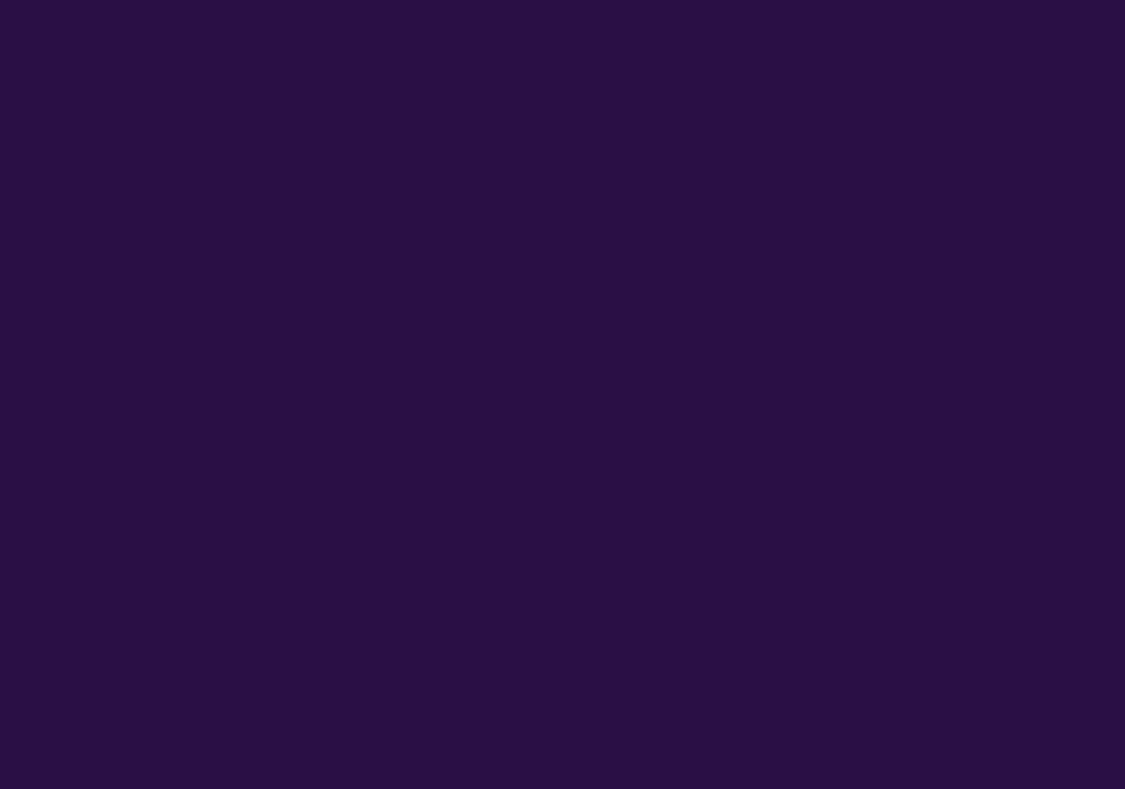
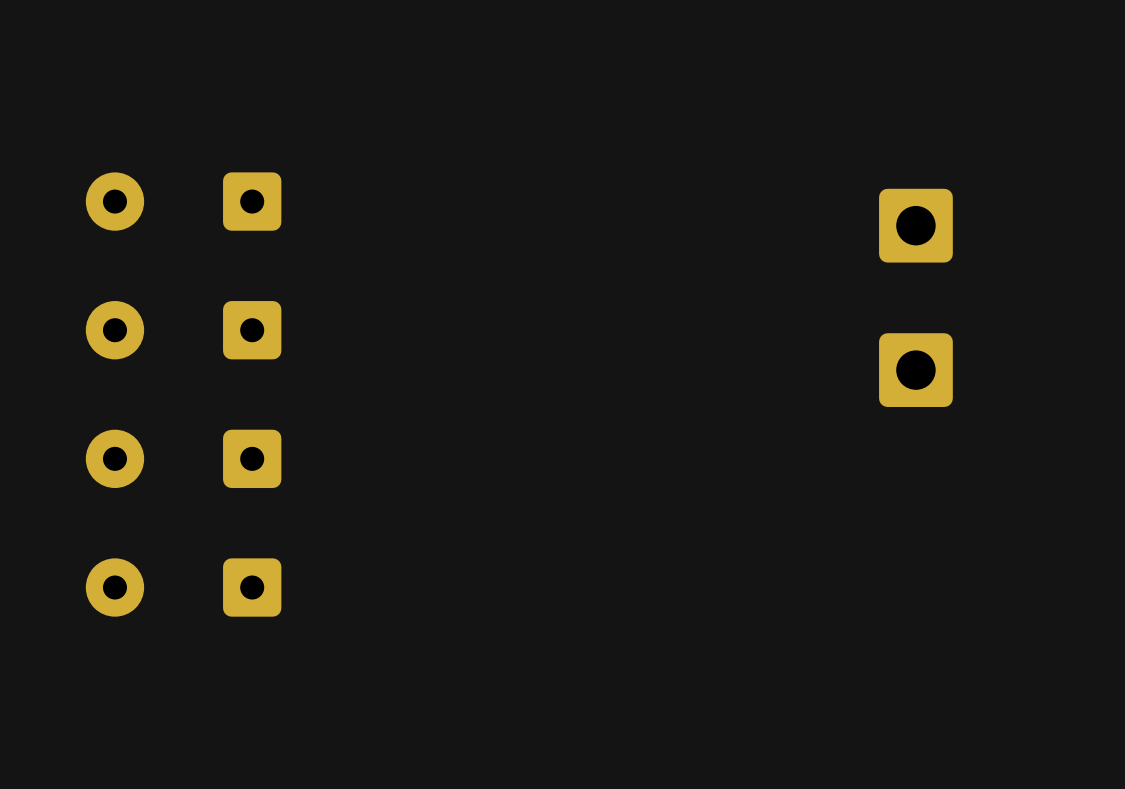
part: none -> (183, 201)
part: none -> (915, 225)
part: none -> (183, 330)
part: none -> (915, 370)
part: none -> (183, 458)
part: none -> (183, 587)

